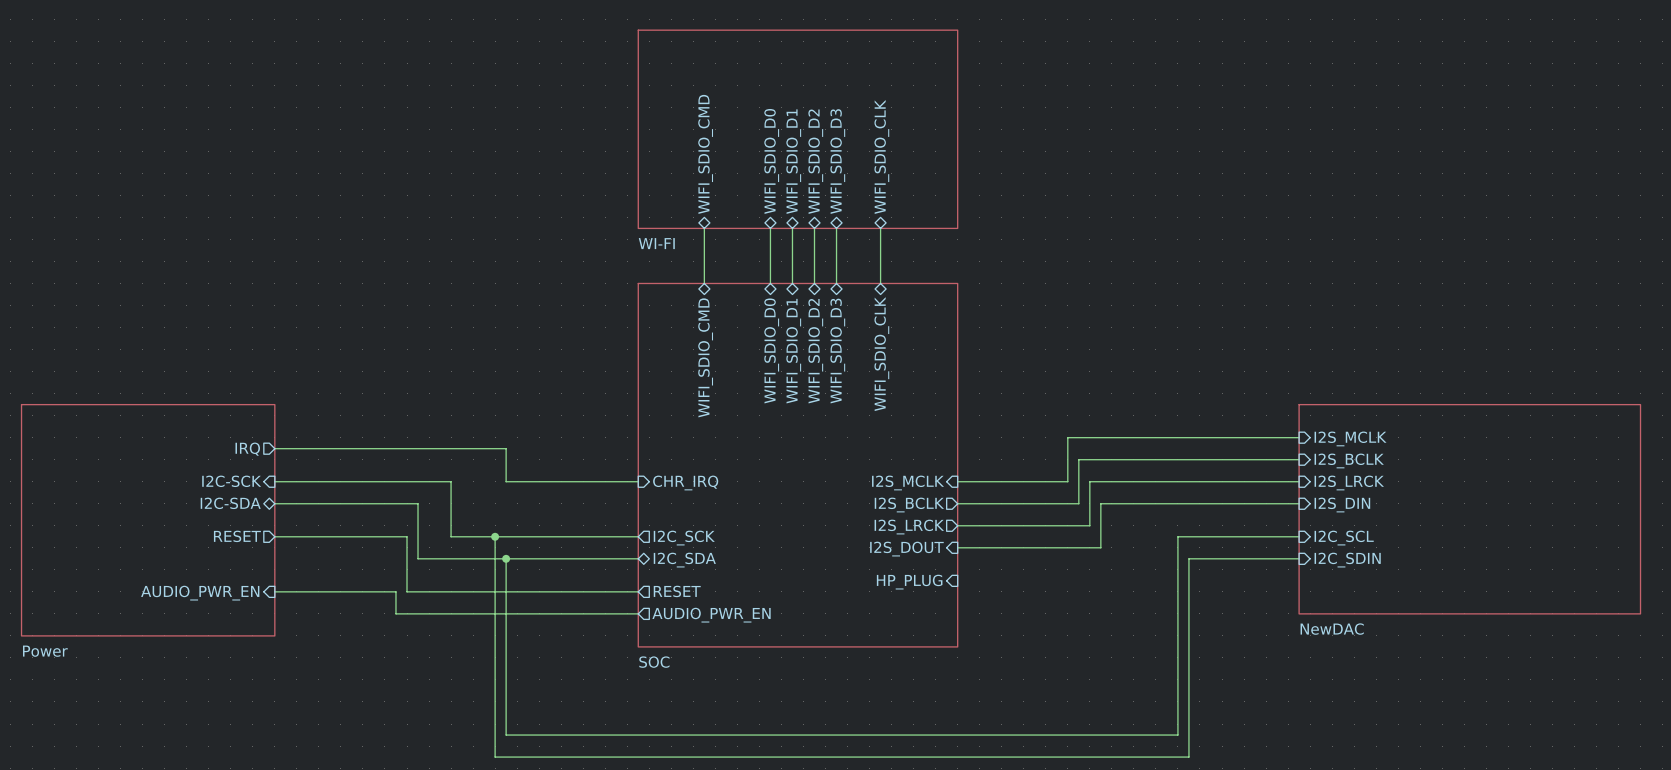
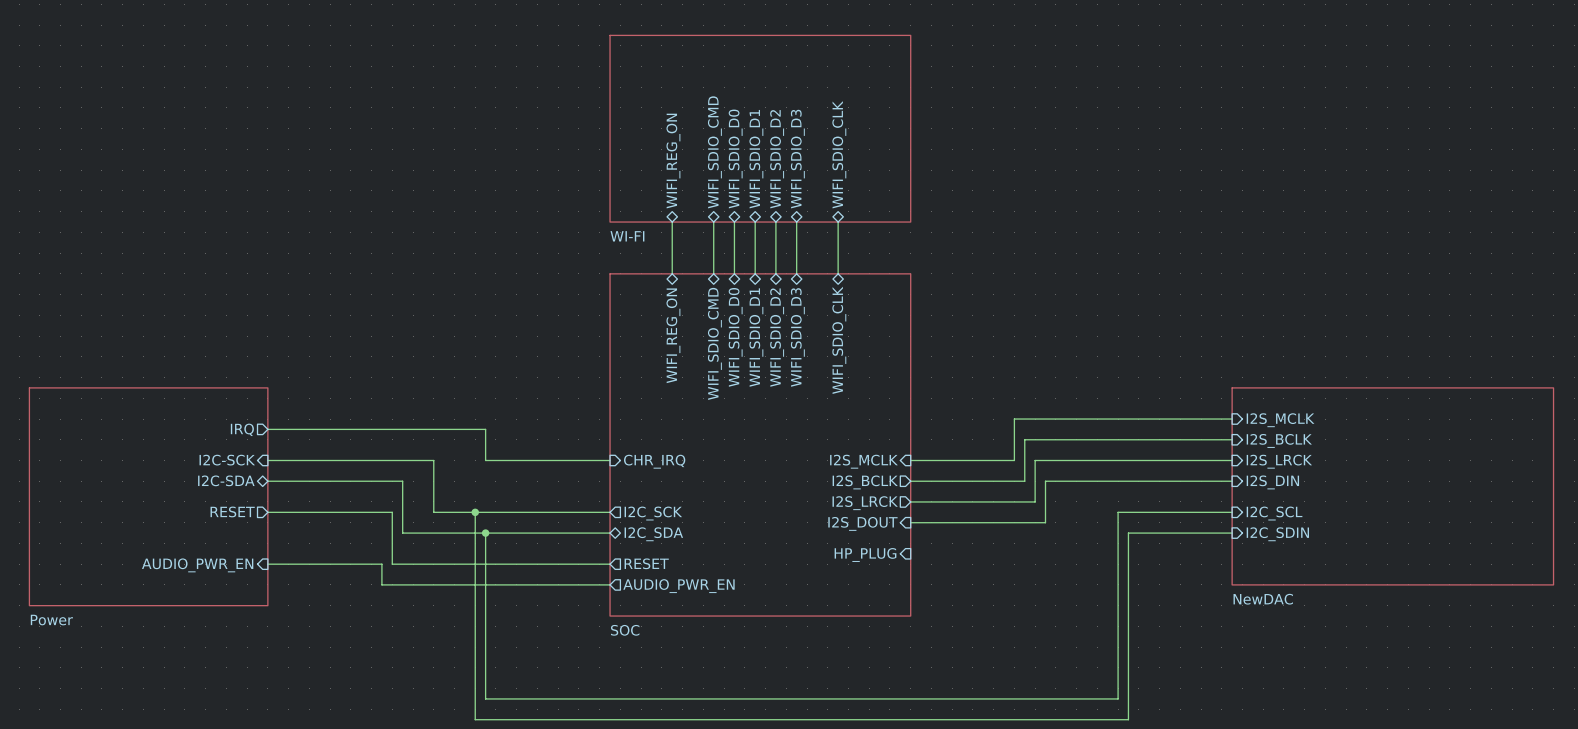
sheet pin: WIFI_SDIO_CMD (705, 154) -> WIFI_REG_ON (673, 161)
sheet pin: none -> WIFI_SDIO_CMD (714, 152)
wire: none -> (713, 222) (713, 273)
sheet pin: WIFI_SDIO_CMD (705, 357) -> WIFI_REG_ON (673, 335)
sheet pin: none -> WIFI_SDIO_CMD (714, 343)

